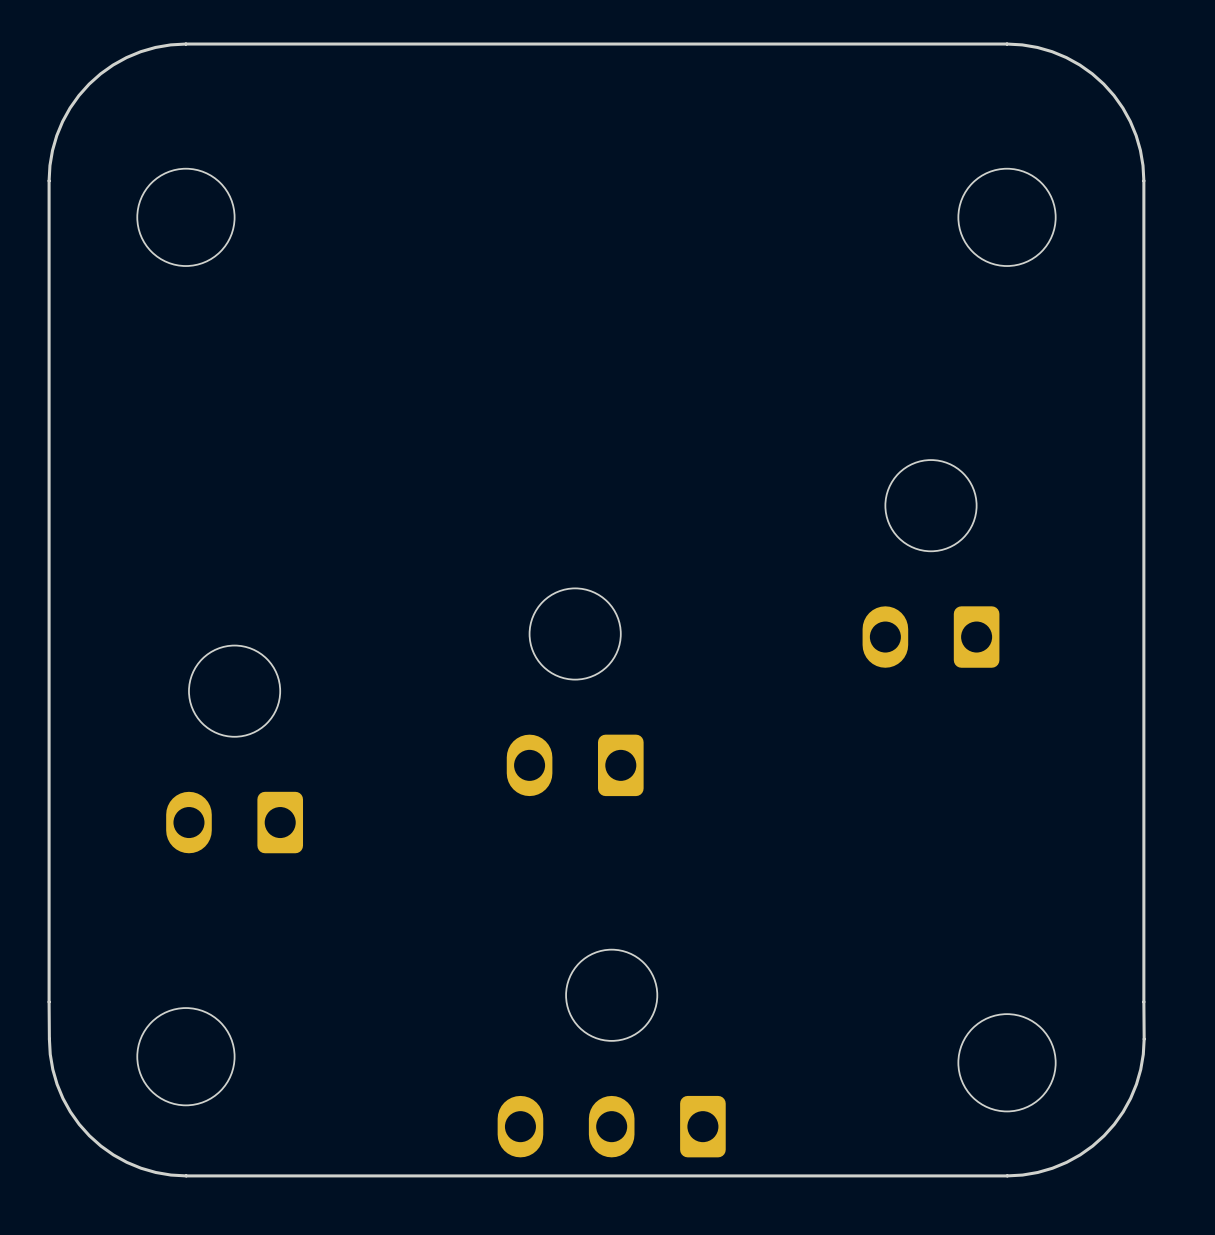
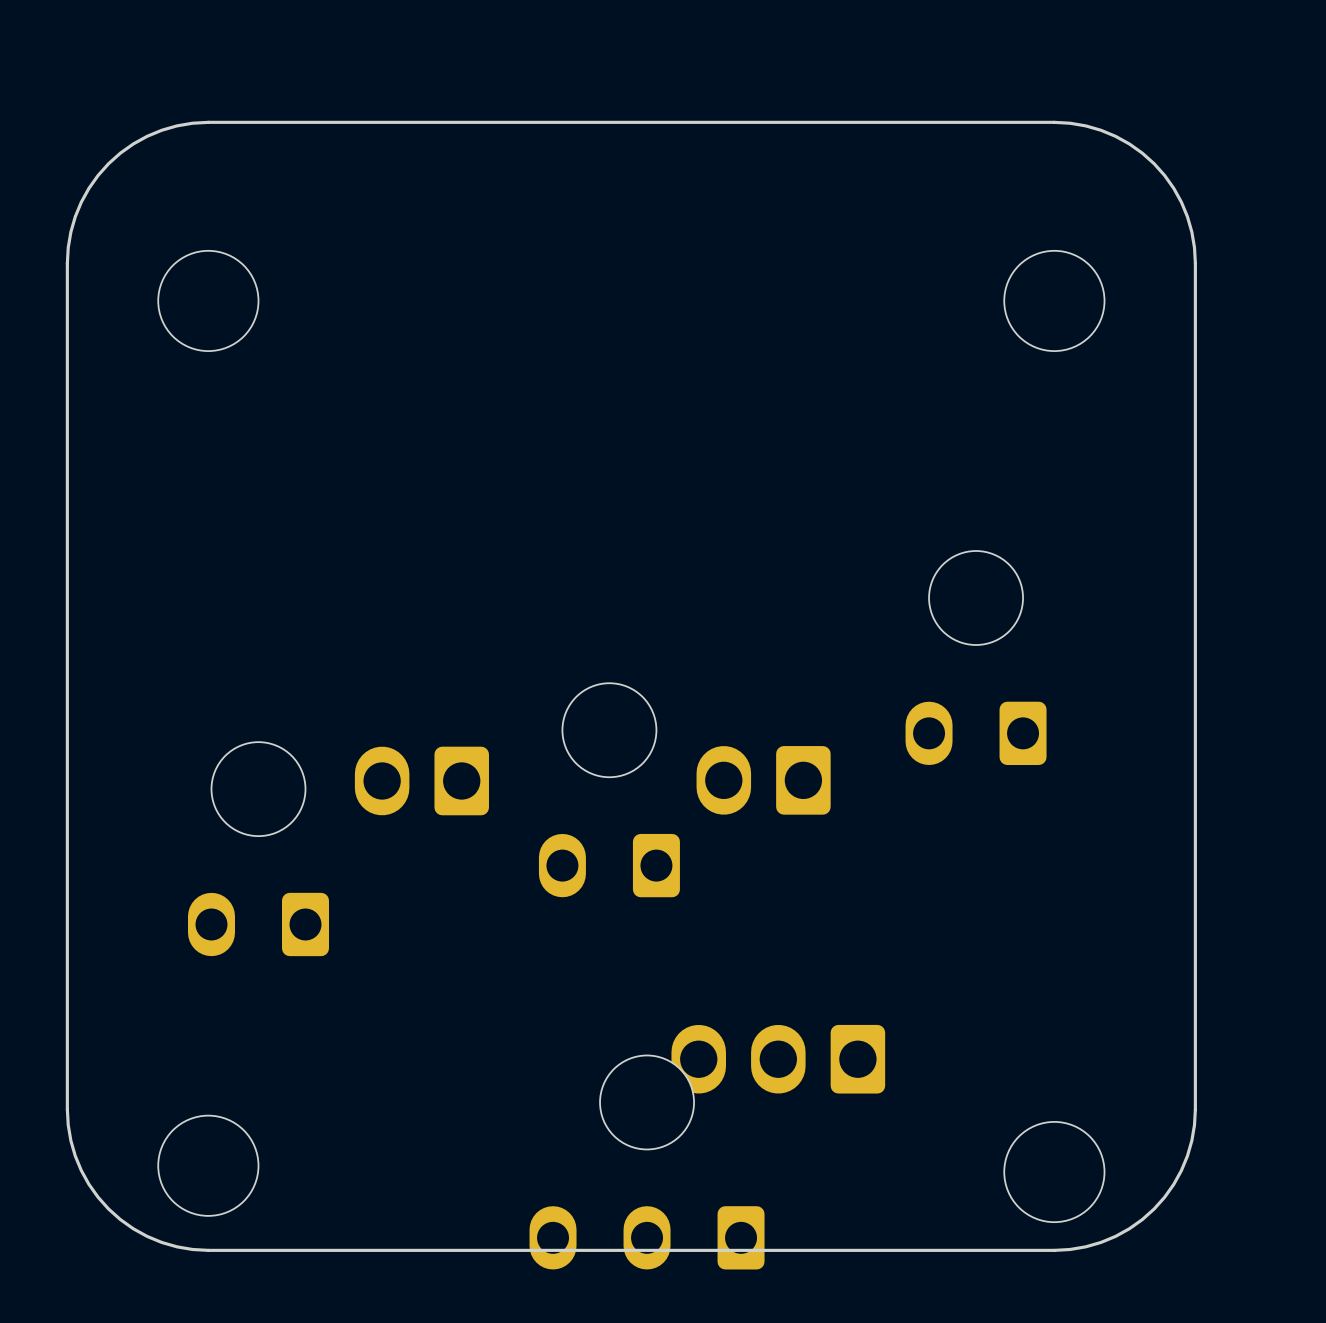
part: none -> (763, 780)
part: none -> (421, 780)
part: none -> (778, 1059)
board edge: (1143, 1001) (1144, 1039) (1140, 1069) (1130, 1098) (1114, 1124) (1092, 1146) (1066, 1162) (1037, 1172) (1007, 1175) (186, 1175) (155, 1172) (126, 1162) (100, 1146) (79, 1124) (70, 1111) (57, 1084) (52, 1069) (49, 1039) (49, 1001) -> (1195, 1109) (1194, 1125) (1187, 1155) (1173, 1184) (1154, 1209) (1129, 1228) (1115, 1236) (1085, 1246) (1054, 1250) (192, 1249) (176, 1246) (147, 1236) (120, 1219) (108, 1209) (88, 1184) (81, 1170) (70, 1140) (67, 1109)

